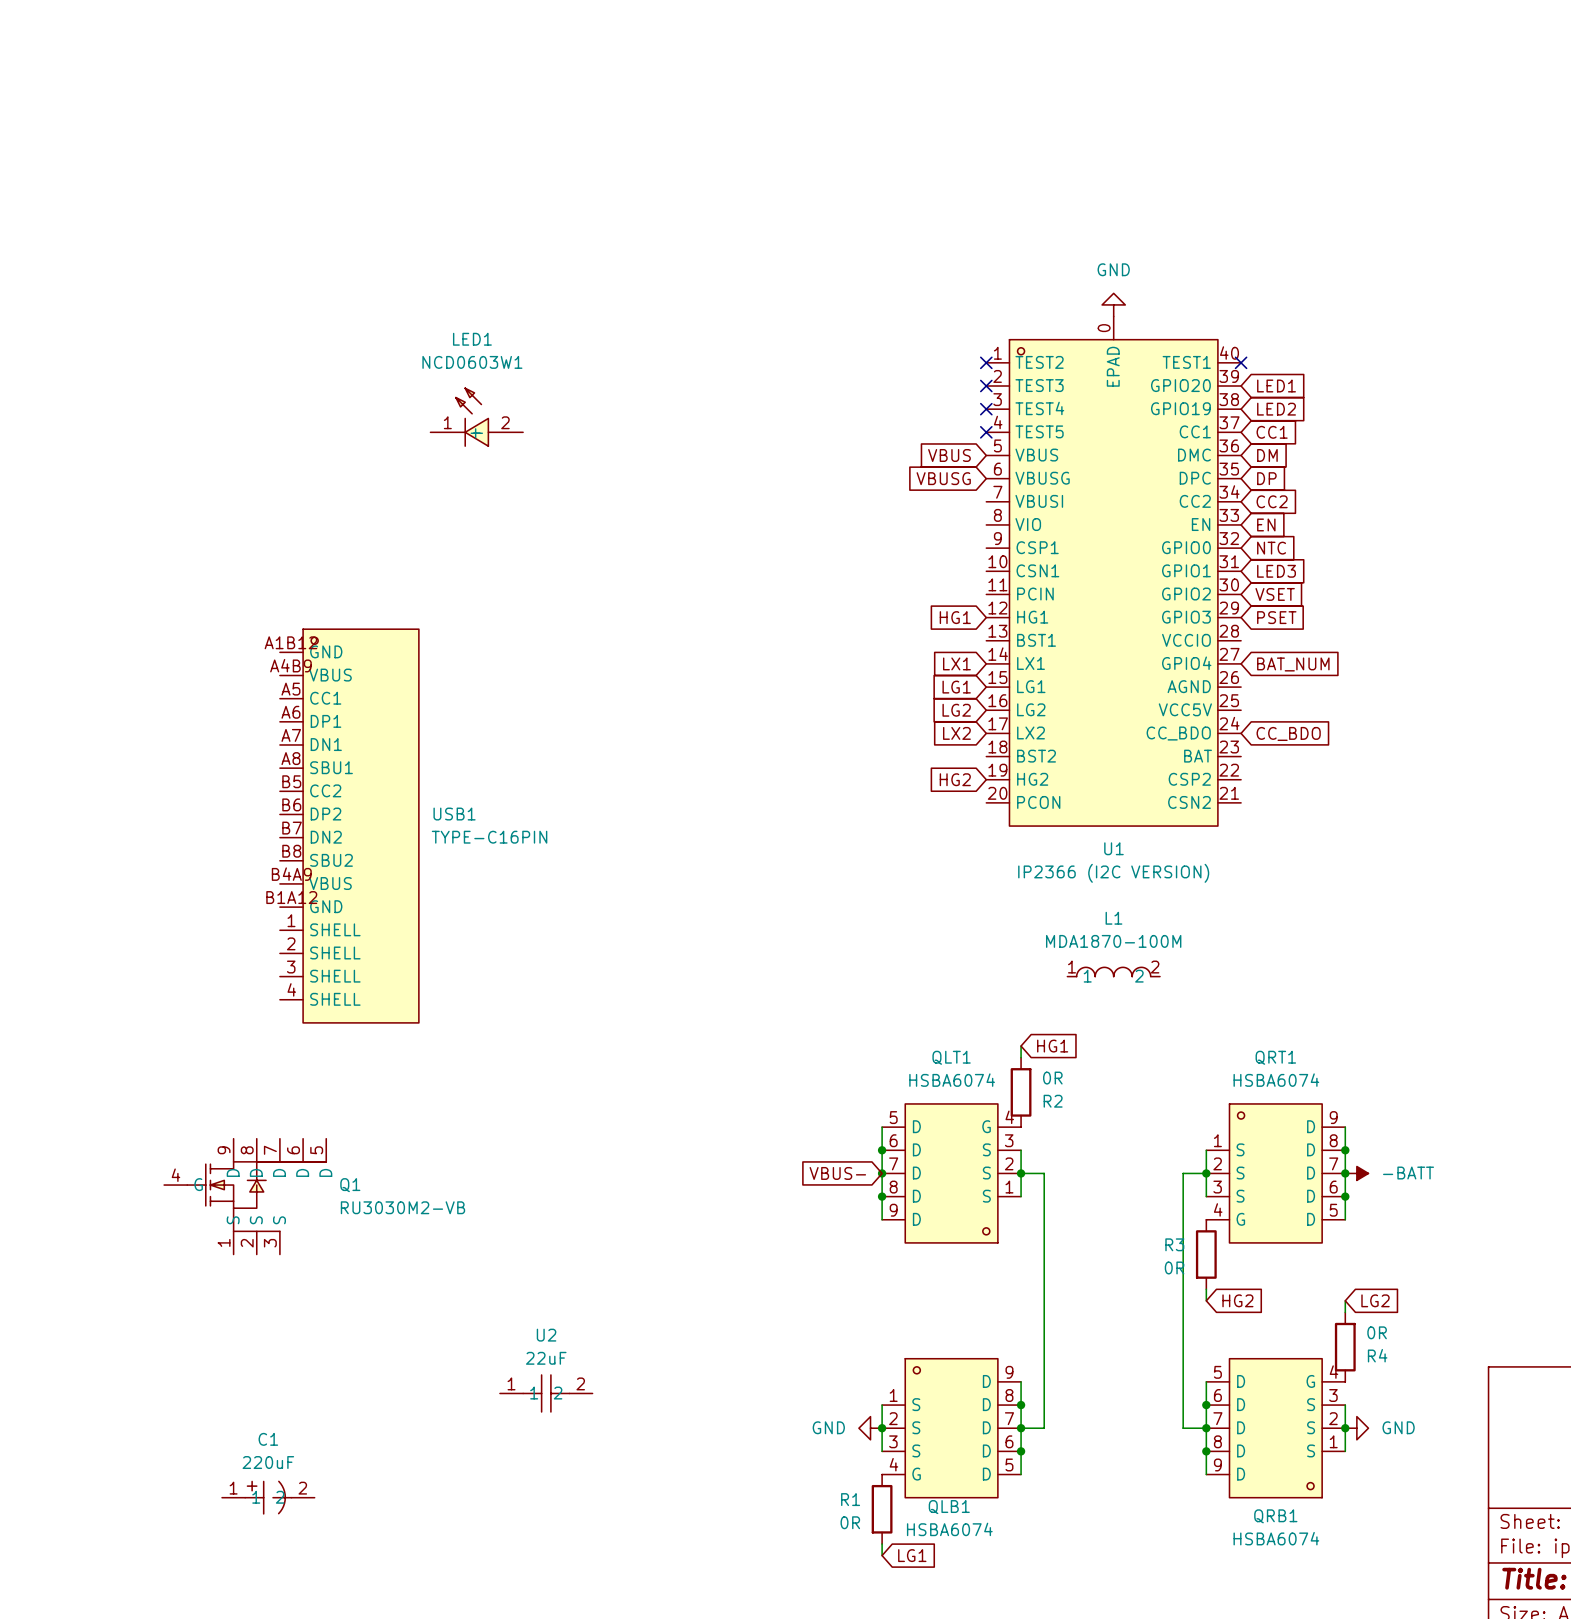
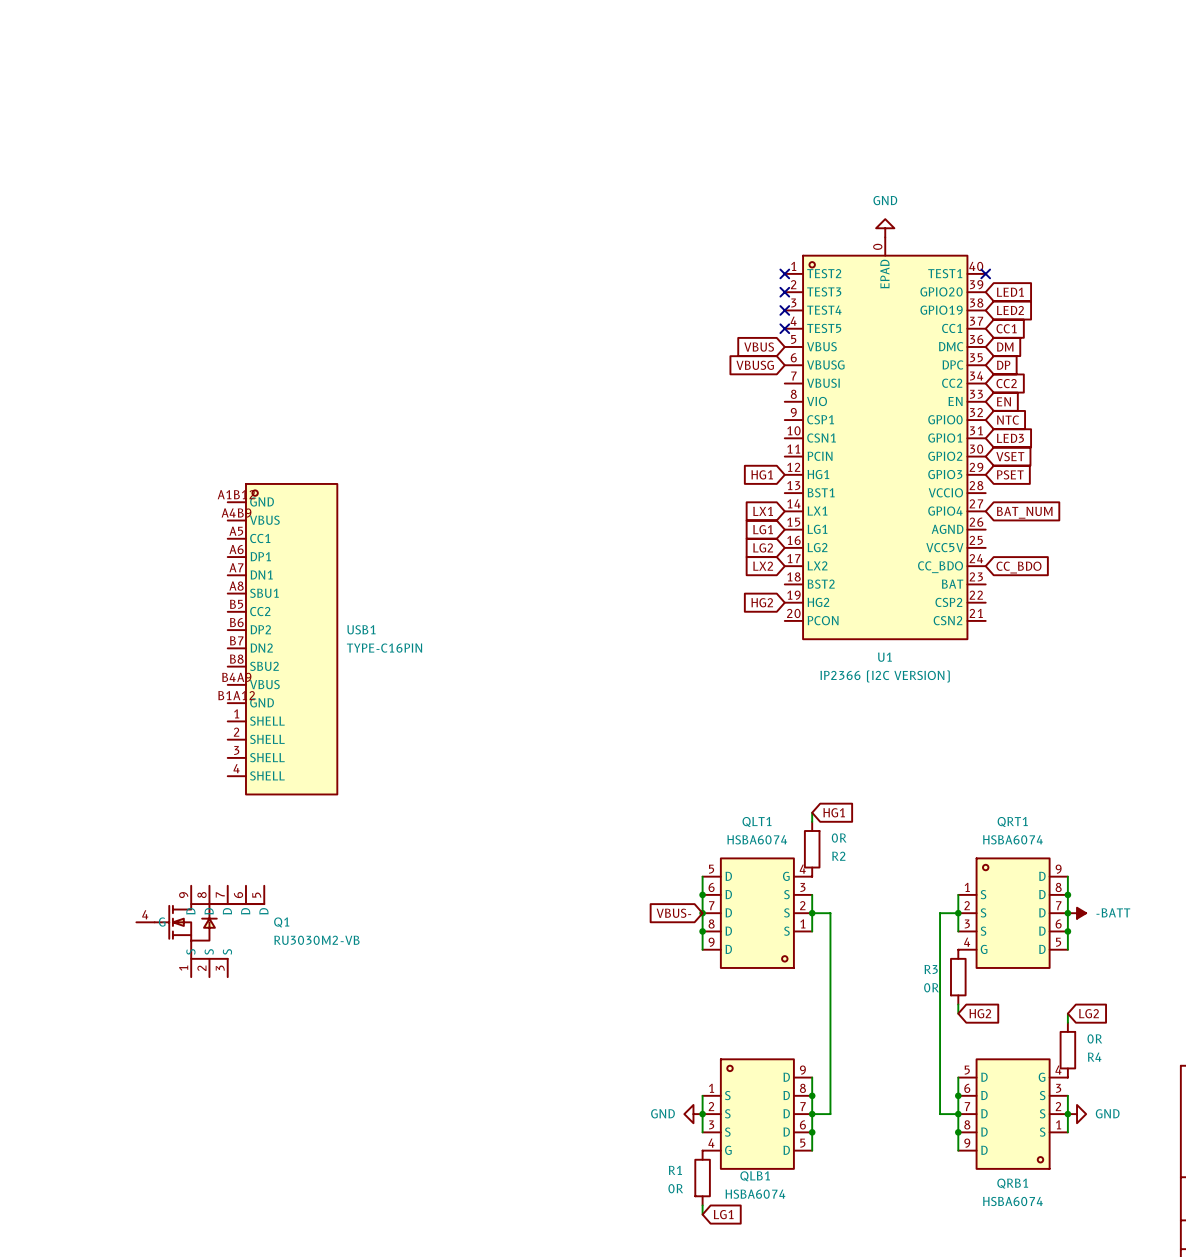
LED1: NCD0603W1 (476, 417) -> none
L1: MDA1870-100M (1113, 972) -> none
U2: 22uF (546, 1393) -> none
C1: 220uF (268, 1497) -> none

